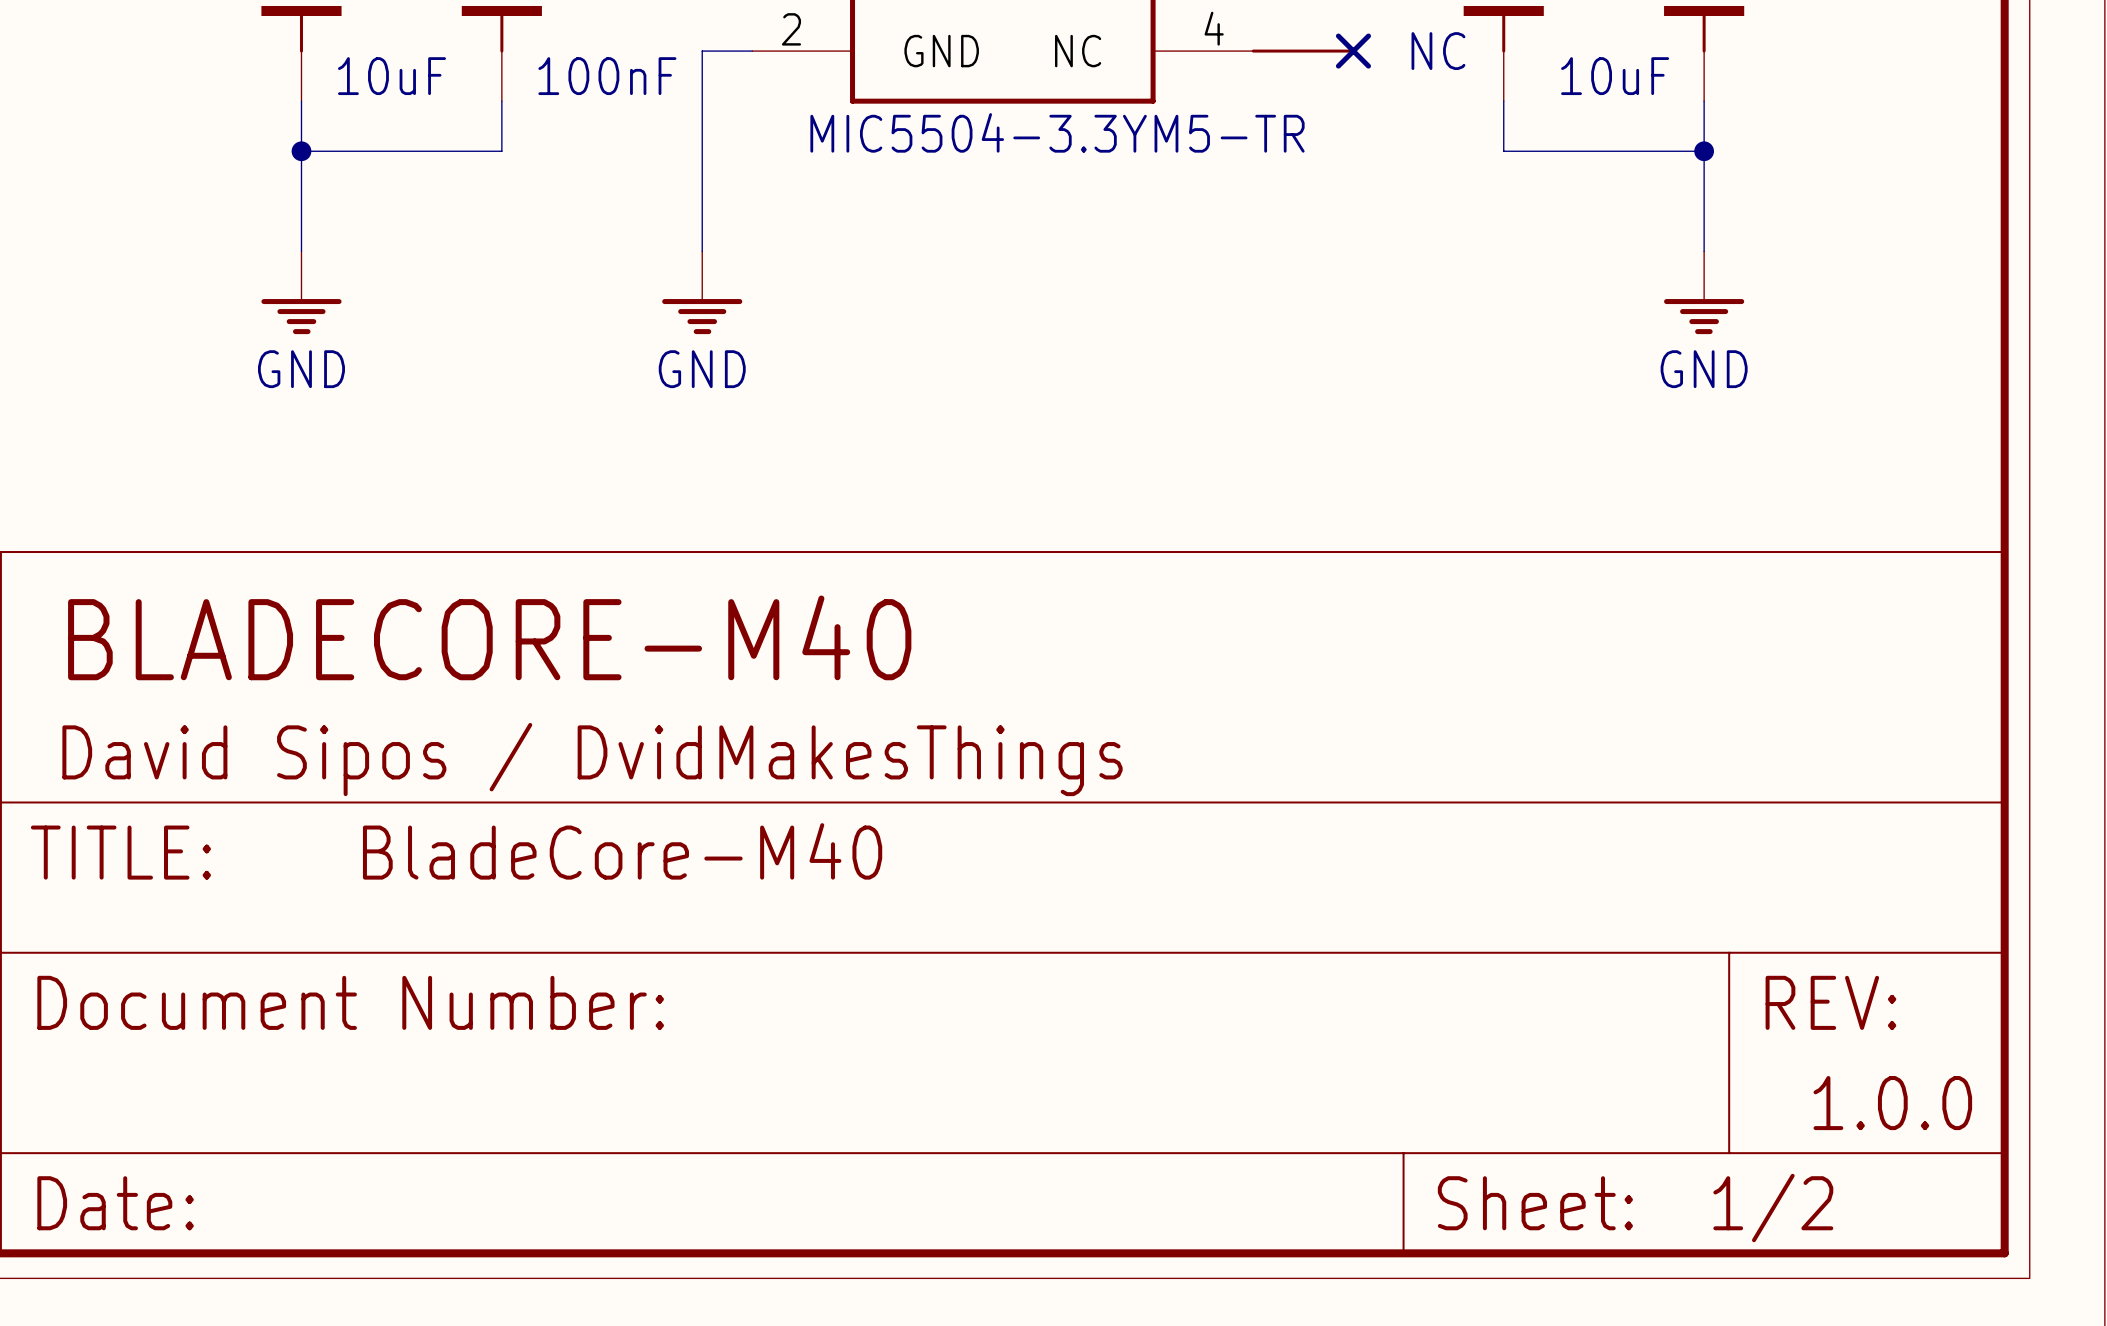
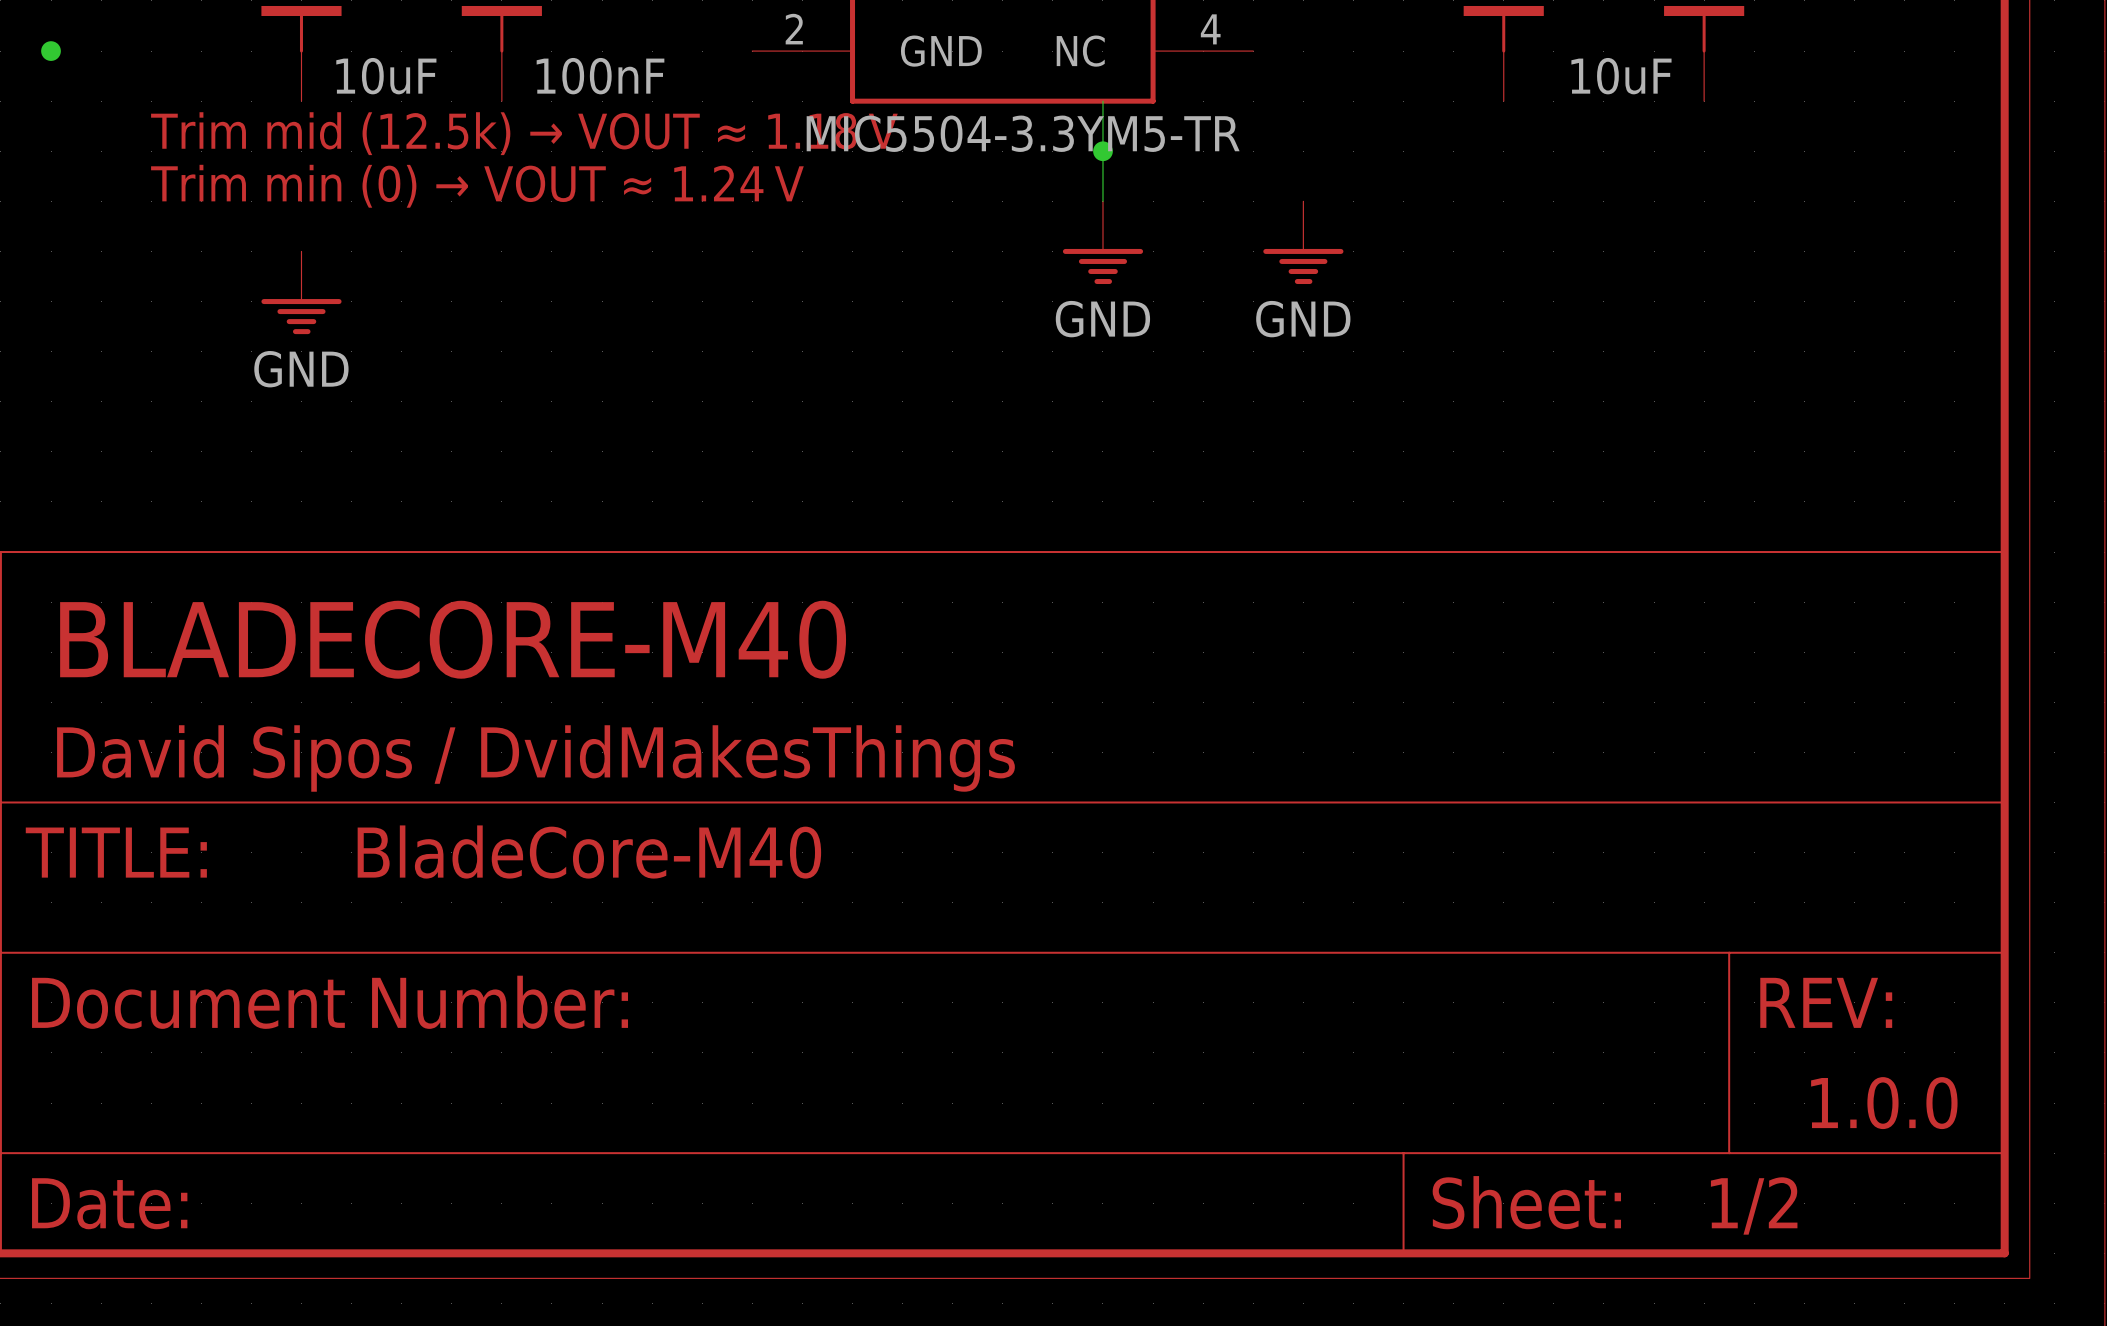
junction: none -> (51, 51)
wire: (752, 51) (702, 51) (702, 251) -> none
part: (1311, 51) -> none
wire: (301, 101) (301, 251) -> none
wire: (501, 101) (501, 151) (301, 151) -> none
wire: none -> (1102, 101) (1102, 201)
wire: (1503, 101) (1503, 151) (1704, 151) -> none
wire: (1704, 101) (1704, 251) -> none
text: none -> Trim mid (12.5k) → VOUT ≈ 1.18 V (524, 133)
junction: (301, 151) -> none
junction: none -> (1102, 151)
junction: (1704, 151) -> none
text: none -> Trim min (0) → VOUT ≈ 1.24 V (477, 186)
power symbol: none -> GND (1102, 242)
power symbol: none -> GND (1303, 242)
power symbol: GND (702, 292) -> none
power symbol: GND (1704, 292) -> none

